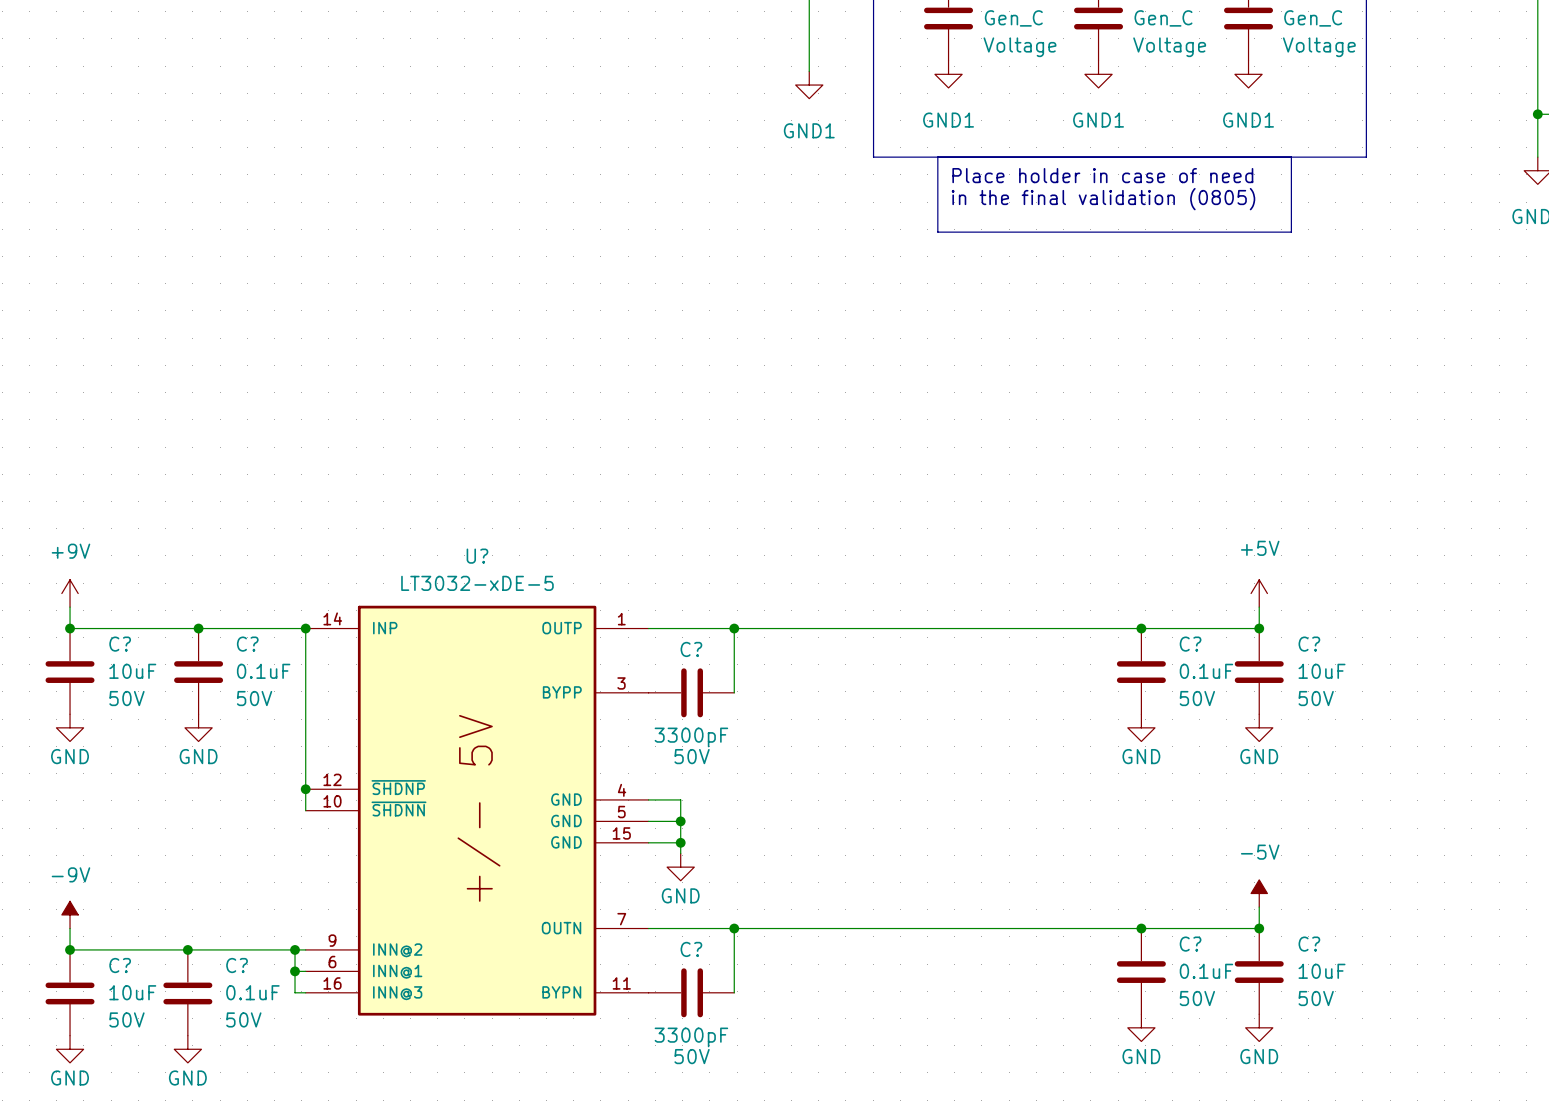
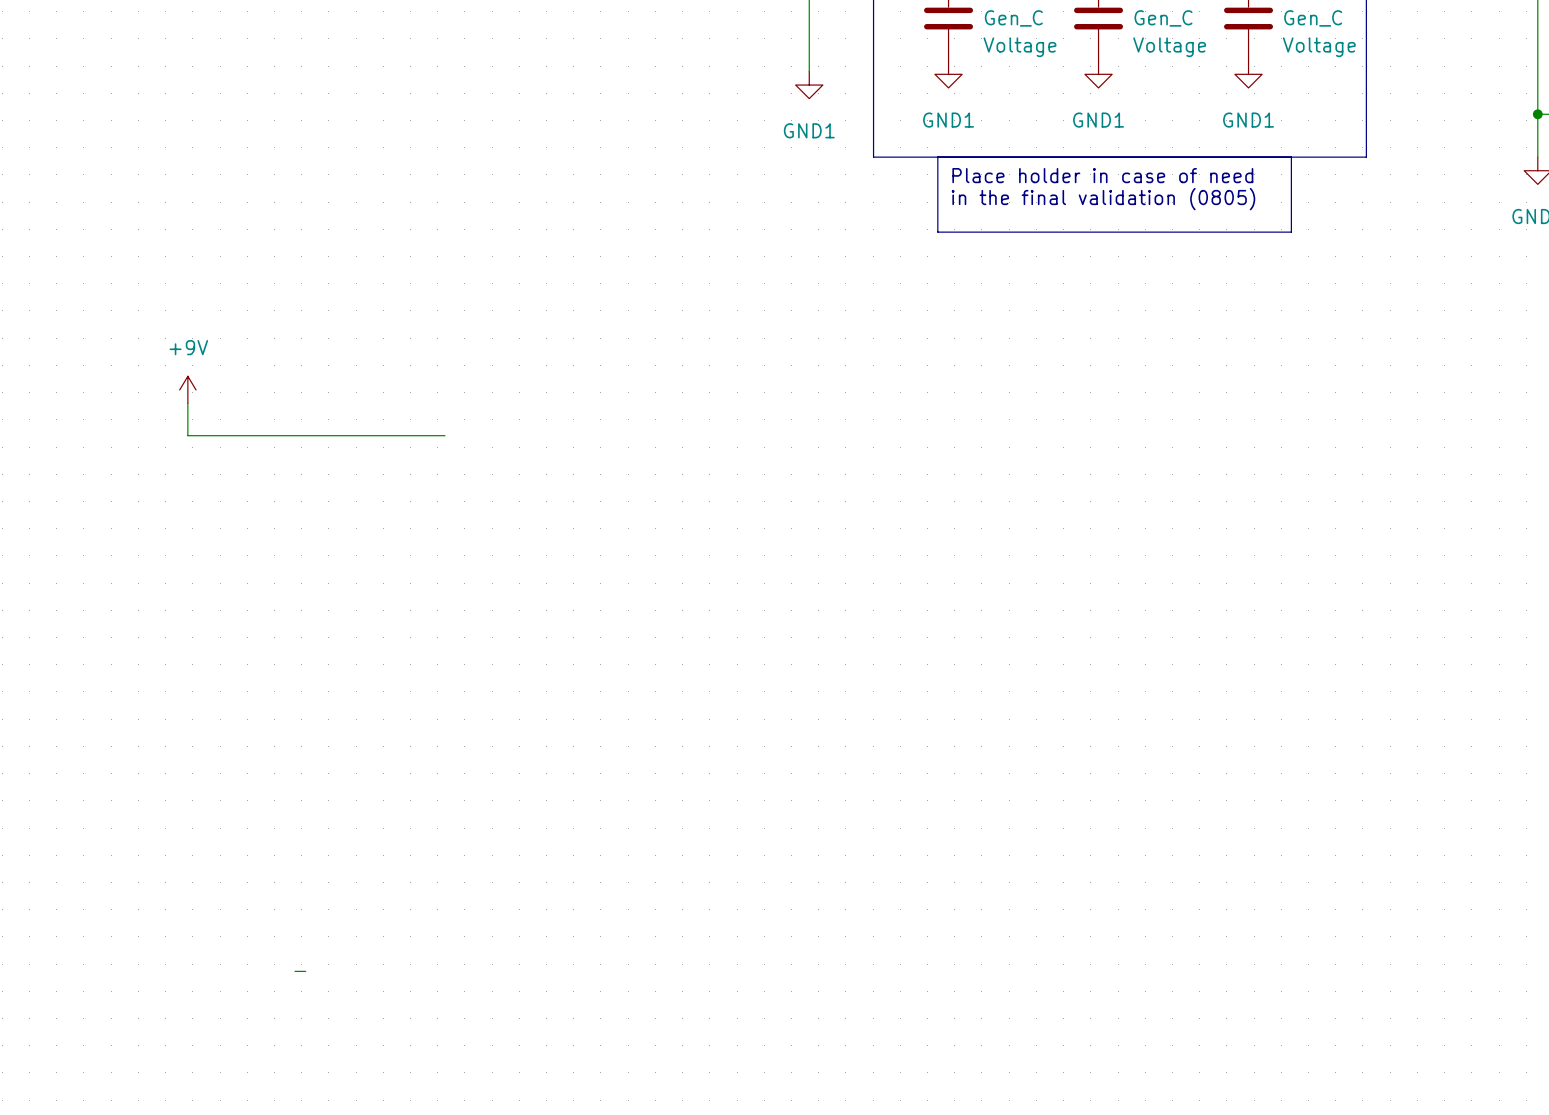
wire: none -> (187, 403) (187, 435) (445, 435)
power symbol position: +9V (70, 593) -> +9V (187, 389)
power symbol: +5V (1259, 593) -> none
wire: (70, 607) (70, 628) (305, 628) (305, 810) -> none
wire: (1259, 607) (1259, 628) (648, 628) -> none
junction: (70, 628) -> none
junction: (198, 628) -> none
junction: (305, 628) -> none
wire: (734, 628) (734, 692) -> none
junction: (734, 628) -> none
junction: (1141, 628) -> none
junction: (1259, 628) -> none
C?: 10uF (70, 671) -> none
C?: 0.1uF (198, 671) -> none
C?: 0.1uF (1141, 671) -> none
C?: 10uF (1259, 671) -> none
C?: 3300pF (691, 692) -> none
power symbol: GND (70, 727) -> none
power symbol: GND (198, 727) -> none
power symbol: GND (1141, 727) -> none
power symbol: GND (1259, 727) -> none
junction: (305, 789) -> none
wire: (648, 799) (680, 799) (680, 853) -> none
U?: LT3032-xDE-5 (477, 810) -> none
wire: (648, 821) (680, 821) -> none
junction: (680, 821) -> none
wire: (648, 842) (680, 842) -> none
junction: (680, 842) -> none
power symbol: GND (680, 867) -> none
power symbol: -5V (1259, 893) -> none
wire: (1259, 907) (1259, 928) (648, 928) -> none
power symbol: -9V (70, 914) -> none
wire: (70, 928) (70, 949) (305, 949) -> none
wire: (734, 928) (734, 992) -> none
junction: (734, 928) -> none
junction: (1141, 928) -> none
junction: (1259, 928) -> none
junction: (70, 949) -> none
junction: (187, 949) -> none
wire: (295, 949) (295, 992) (305, 992) -> none
junction: (295, 949) -> none
junction: (295, 971) -> none
C?: 0.1uF (1141, 971) -> none
C?: 10uF (1259, 971) -> none
C?: 10uF (70, 992) -> none
C?: 0.1uF (187, 992) -> none
C?: 3300pF (691, 992) -> none
power symbol: GND (1141, 1027) -> none
power symbol: GND (1259, 1027) -> none
power symbol: GND (70, 1049) -> none
power symbol: GND (187, 1049) -> none

